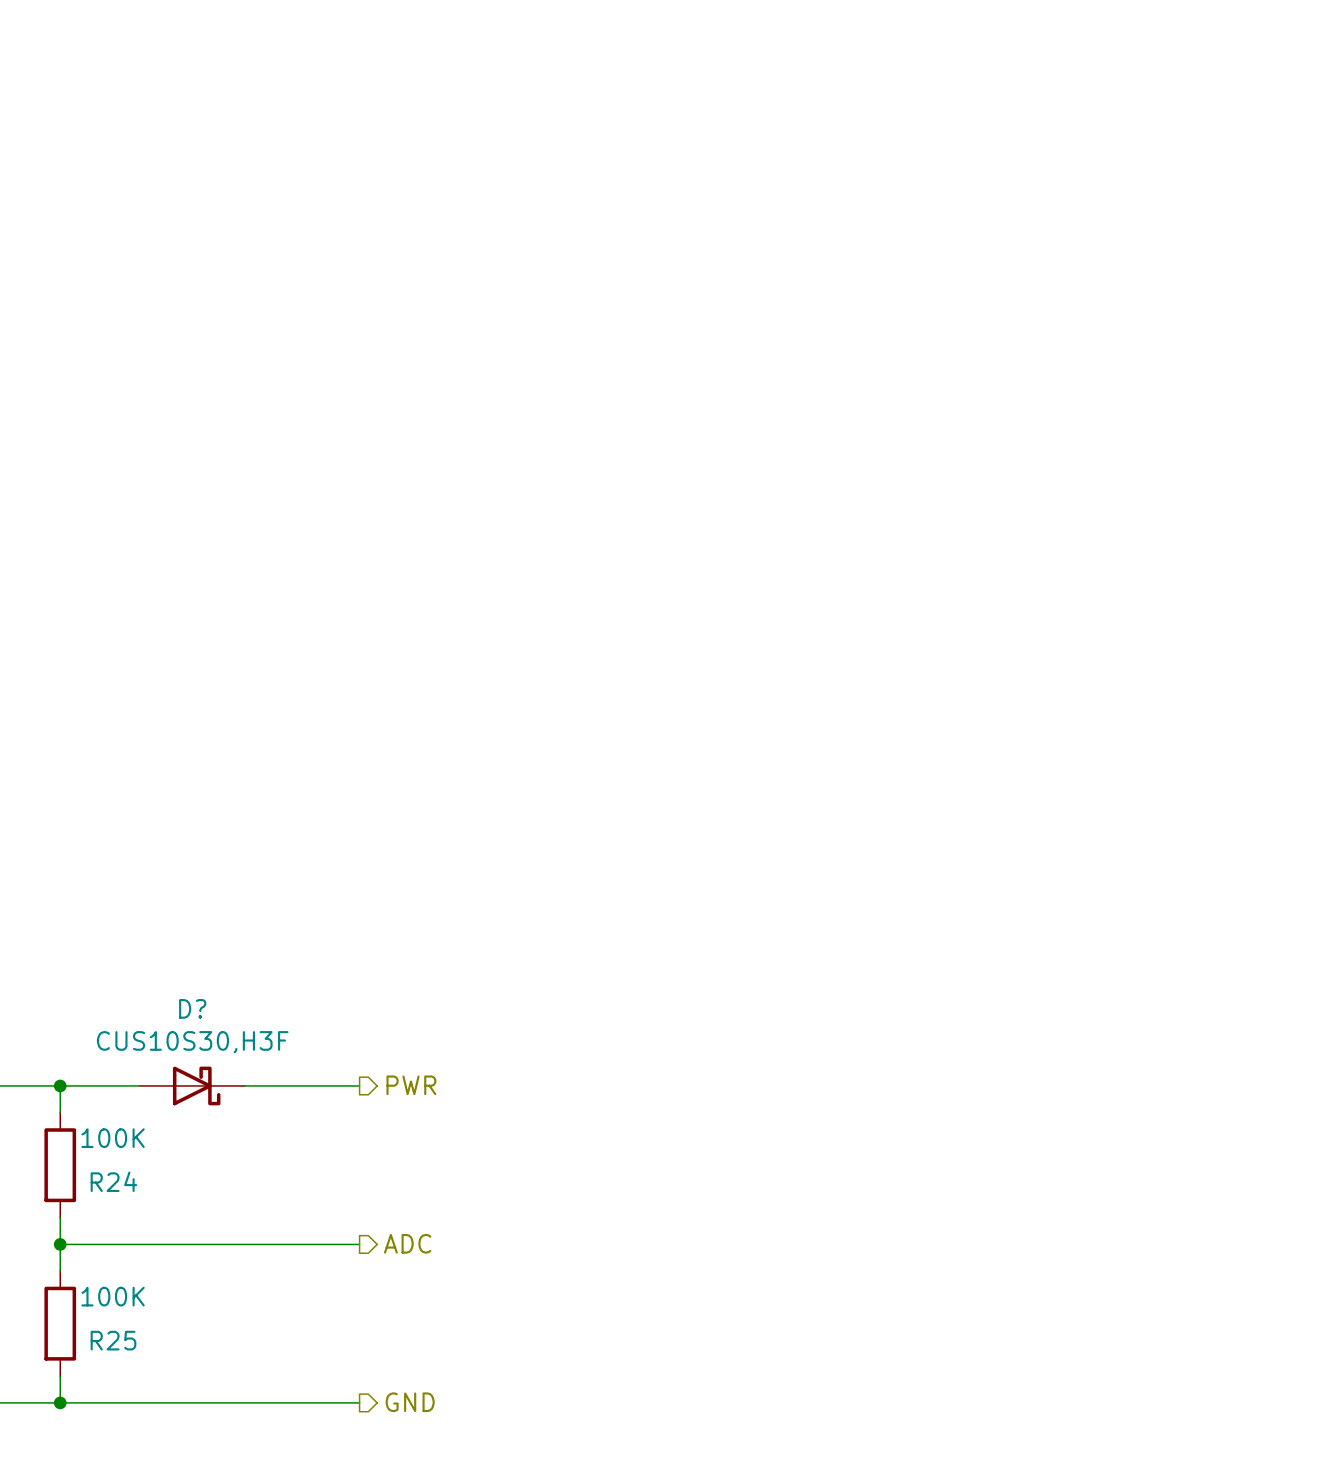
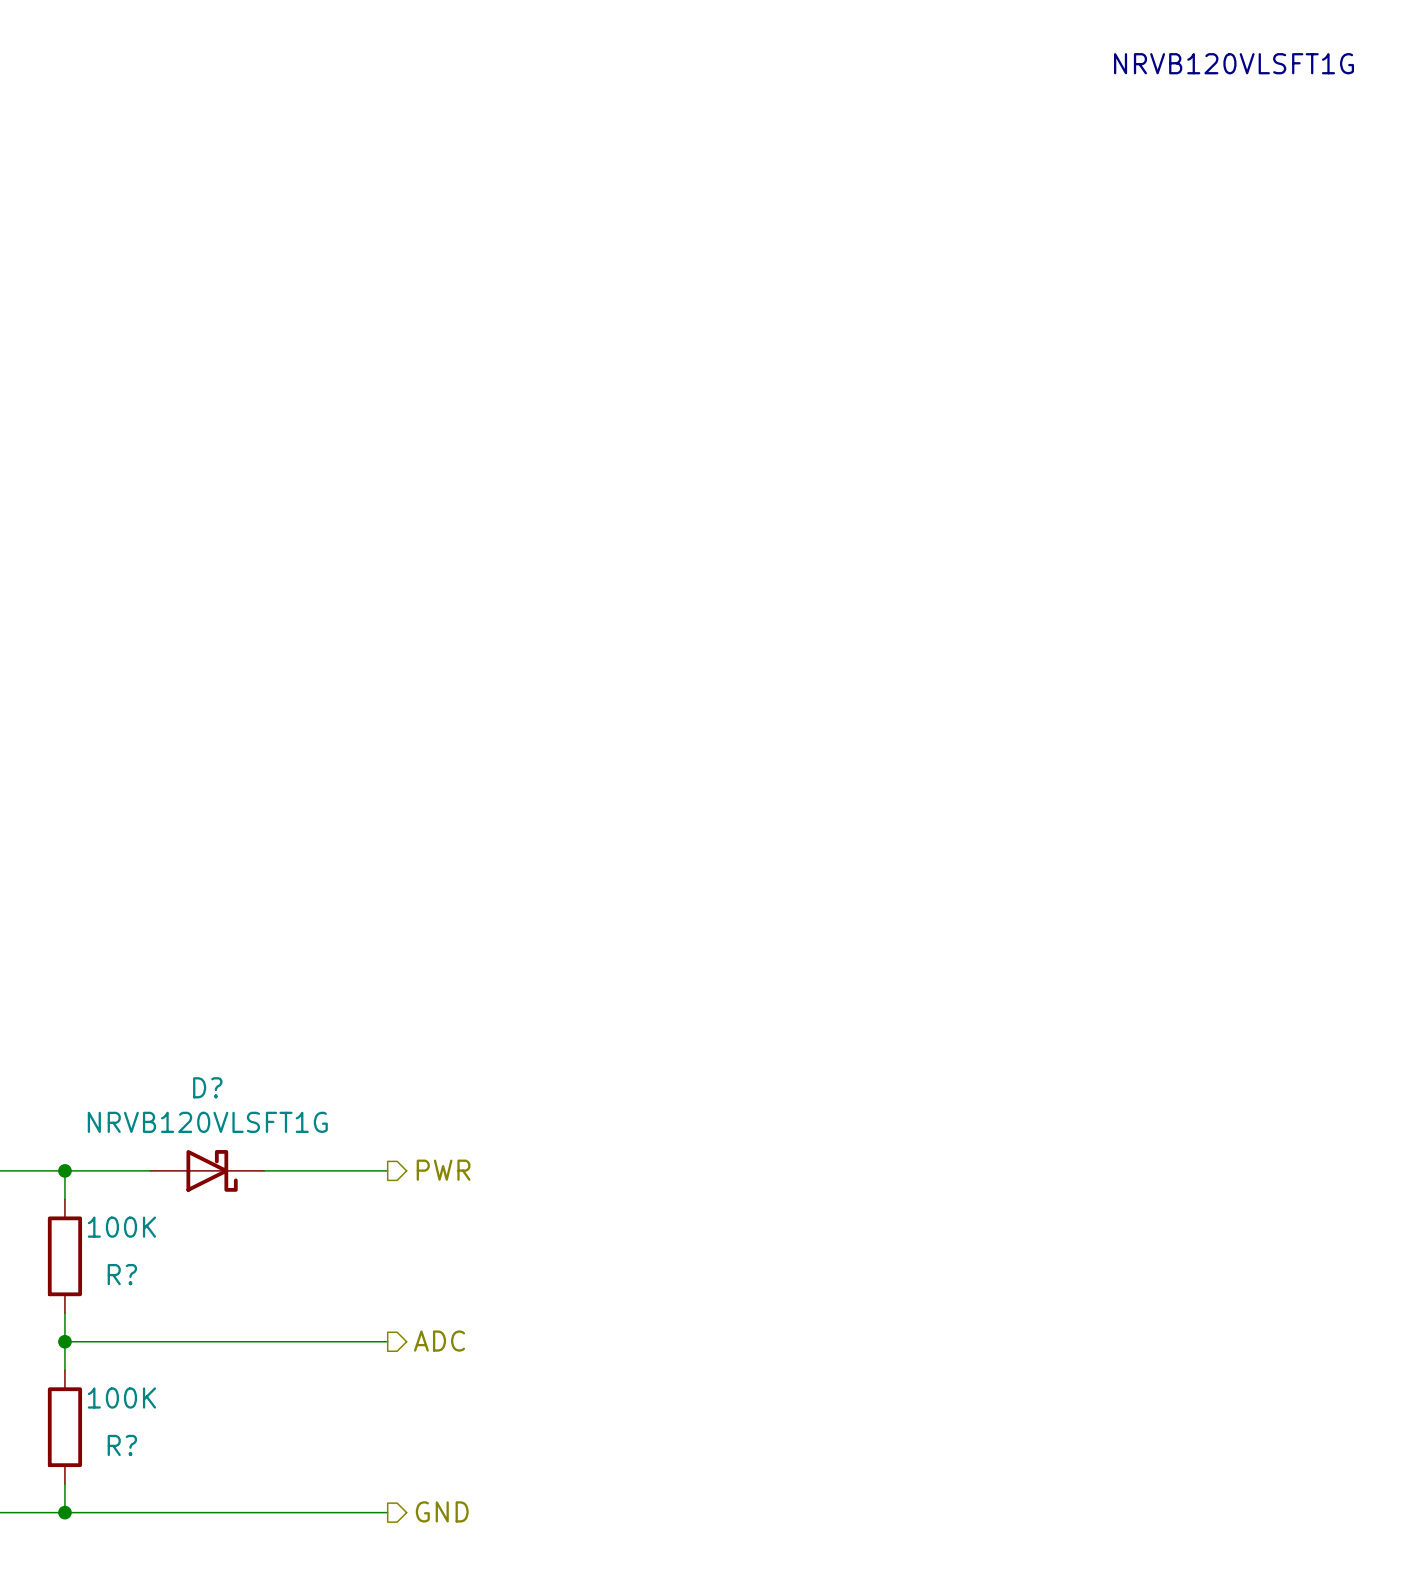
text: none -> NRVB120VLSFT1G (1234, 63)
D? value: CUS10S30,H3F (192, 1042) -> NRVB120VLSFT1G (207, 1122)
R24 name: R24 (113, 1181) -> R? (122, 1274)
R25 name: R25 (113, 1340) -> R? (122, 1445)

